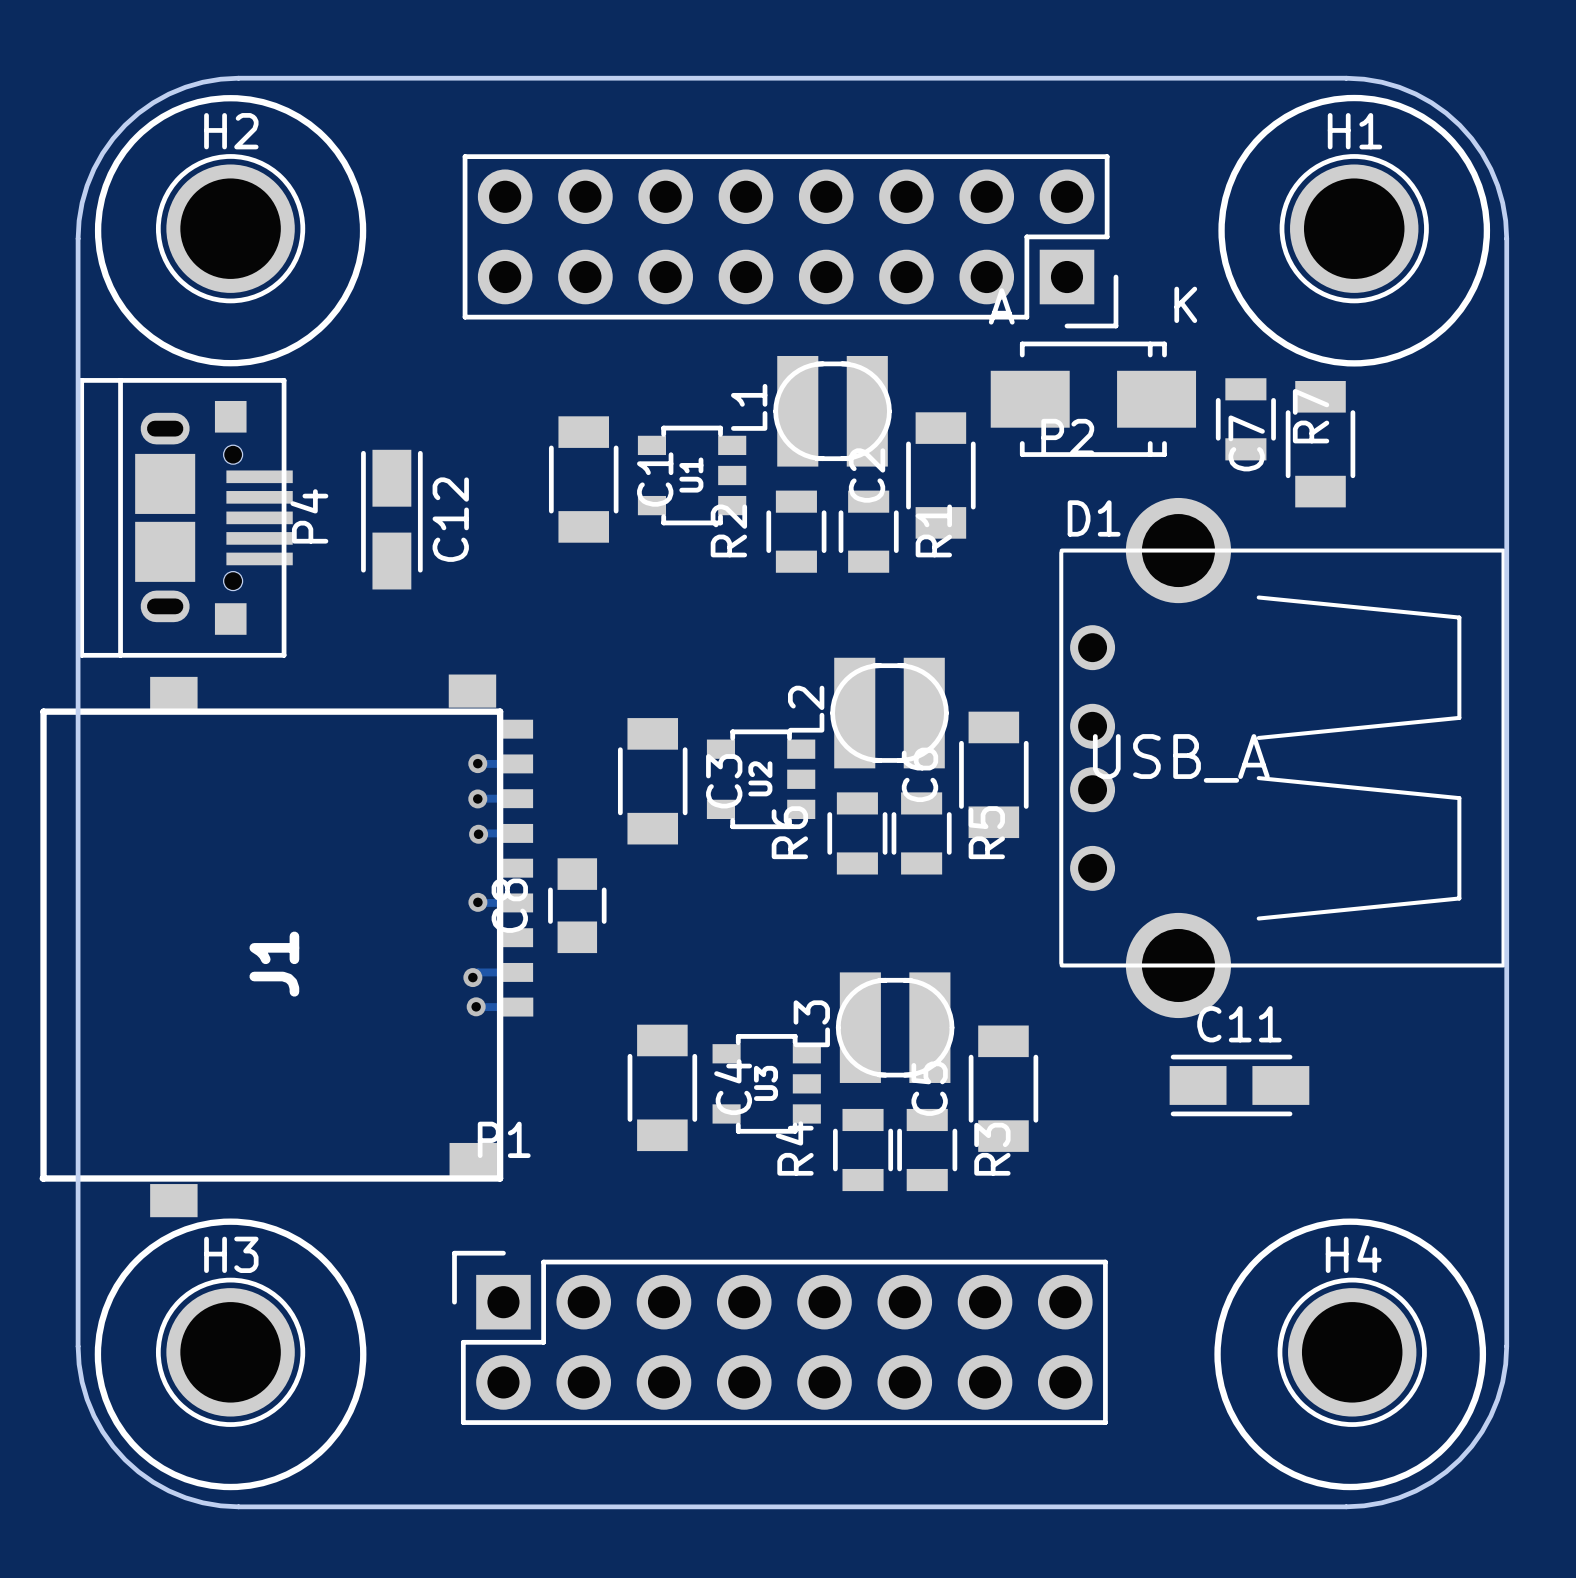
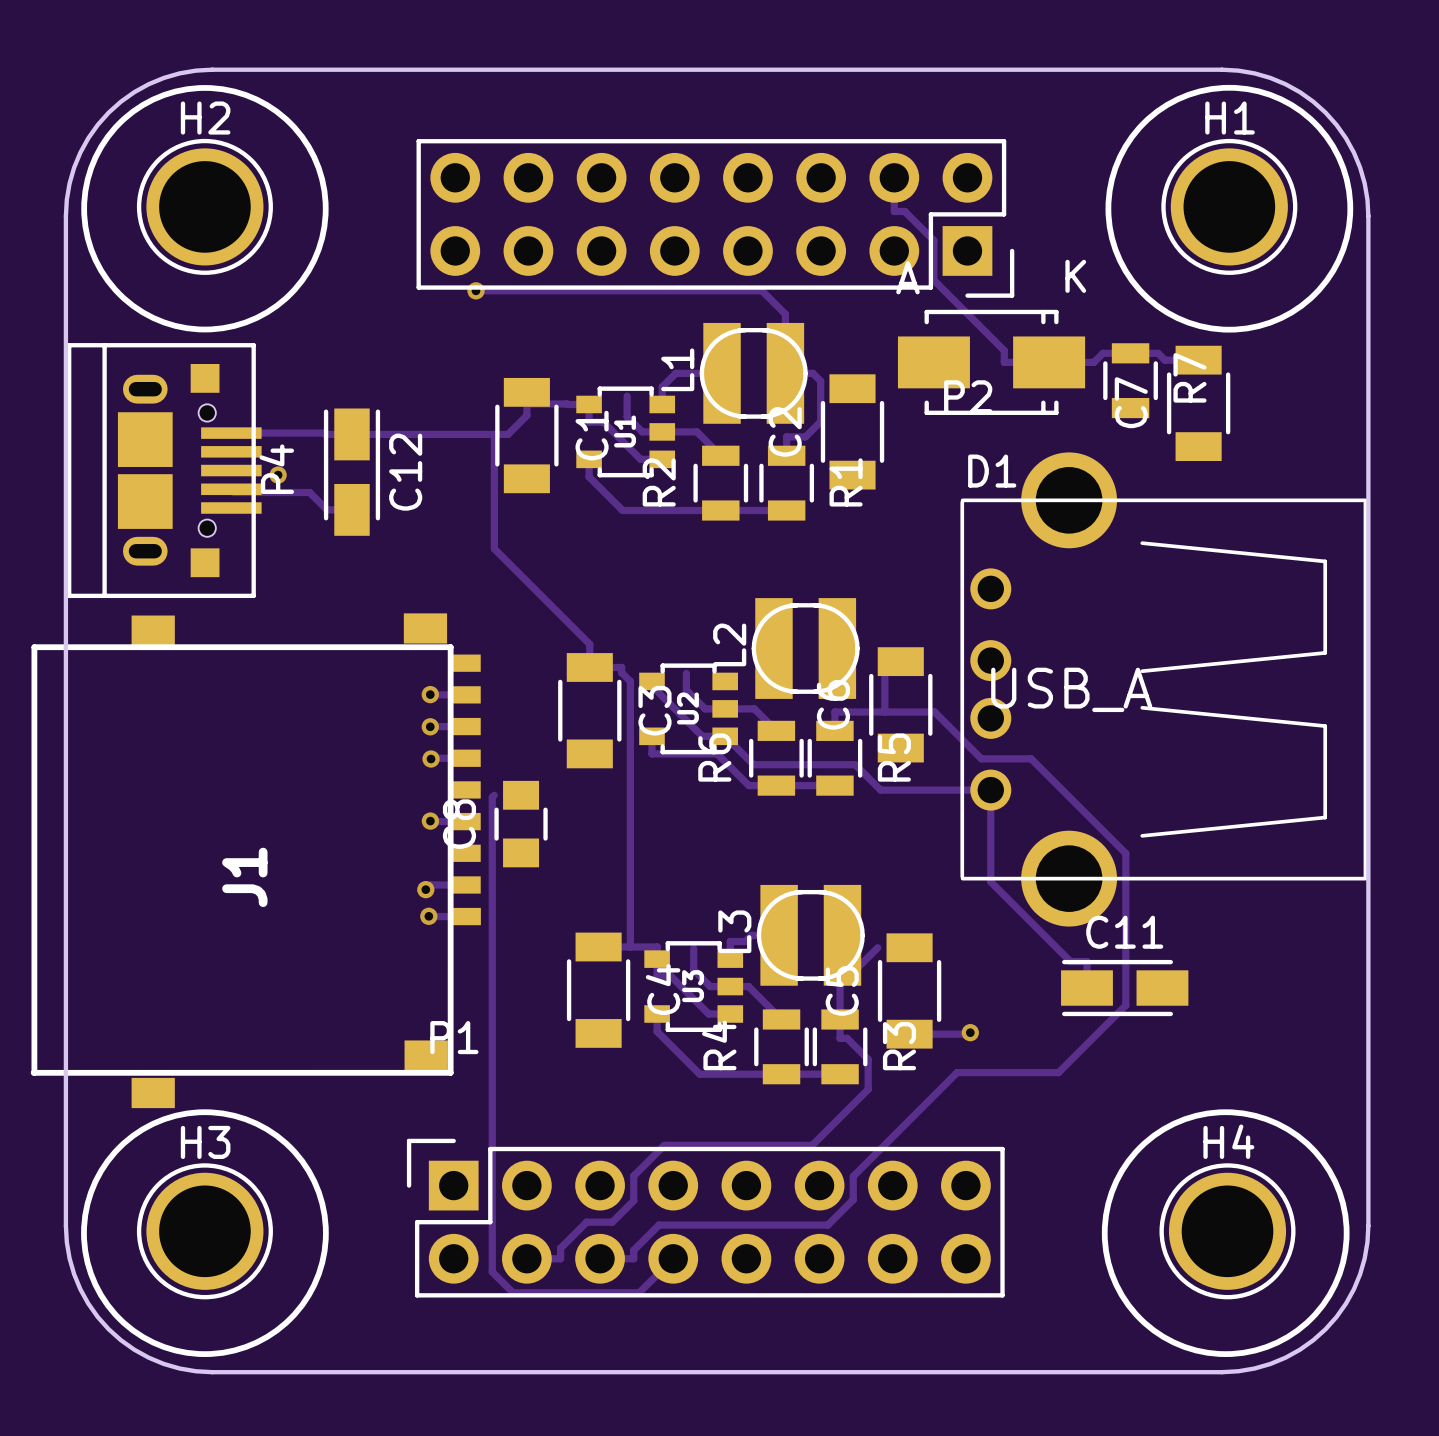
track: none -> (894, 177) (894, 211) (904, 211) (933, 240) (933, 280) (1004, 350) (1004, 362) (1093, 362) (1102, 353) (1158, 353) (1164, 360) (1198, 360)
track: none -> (476, 290) (762, 290) (785, 314) (785, 373) (812, 373) (820, 381) (820, 421) (805, 436) (786, 436) (786, 455)
via: none -> (476, 290)
track: none -> (722, 373) (675, 373) (662, 386) (662, 404)
track: none -> (526, 392) (526, 415) (508, 434) (231, 433)
track: none -> (627, 396) (627, 416) (642, 431) (696, 431) (720, 455)
track: none -> (526, 403) (589, 404) (589, 422) (603, 422) (640, 459) (662, 459)
track: none -> (494, 434) (494, 548) (589, 644) (589, 667) (621, 667) (621, 672) (630, 681) (630, 947)
track: none -> (589, 459) (589, 476) (622, 510) (786, 510)
via: none -> (278, 475)
track: none -> (231, 489) (234, 492) (309, 492) (327, 509) (352, 509)
track: none -> (884, 661) (884, 712)
track: none -> (686, 673) (686, 690) (705, 708) (754, 708) (776, 730)
track: none -> (647, 681) (702, 736) (725, 736) (753, 764) (855, 764) (880, 790) (990, 790) (990, 881) (1070, 961) (1086, 961) (1086, 988)
track: none -> (834, 730) (834, 712) (934, 712) (981, 758) (1031, 758) (1125, 853) (1125, 1005) (1058, 1072) (957, 1072) (853, 1176) (853, 1199) (827, 1225) (658, 1225) (633, 1250) (633, 1258) (600, 1258)
track: none -> (652, 736) (652, 753) (717, 753) (748, 785) (834, 785)
track: none -> (494, 795) (492, 797) (492, 1272) (513, 1292) (639, 1292) (673, 1258)
track: none -> (779, 935) (751, 935) (745, 941) (730, 941) (730, 959)
track: none -> (598, 947) (657, 947) (657, 976) (671, 976) (708, 1013) (730, 1013)
track: none -> (877, 947) (840, 985) (840, 1038) (847, 1038) (868, 1059) (868, 1089) (812, 1145) (664, 1145) (633, 1176) (633, 1200) (612, 1222) (586, 1222) (560, 1248) (560, 1258) (526, 1258)
track: none -> (693, 948) (693, 969) (710, 986) (748, 986) (781, 1019)
track: none -> (657, 1013) (657, 1031) (699, 1074) (840, 1074)
track: none -> (970, 1032) (909, 1034)
via: none -> (970, 1032)

